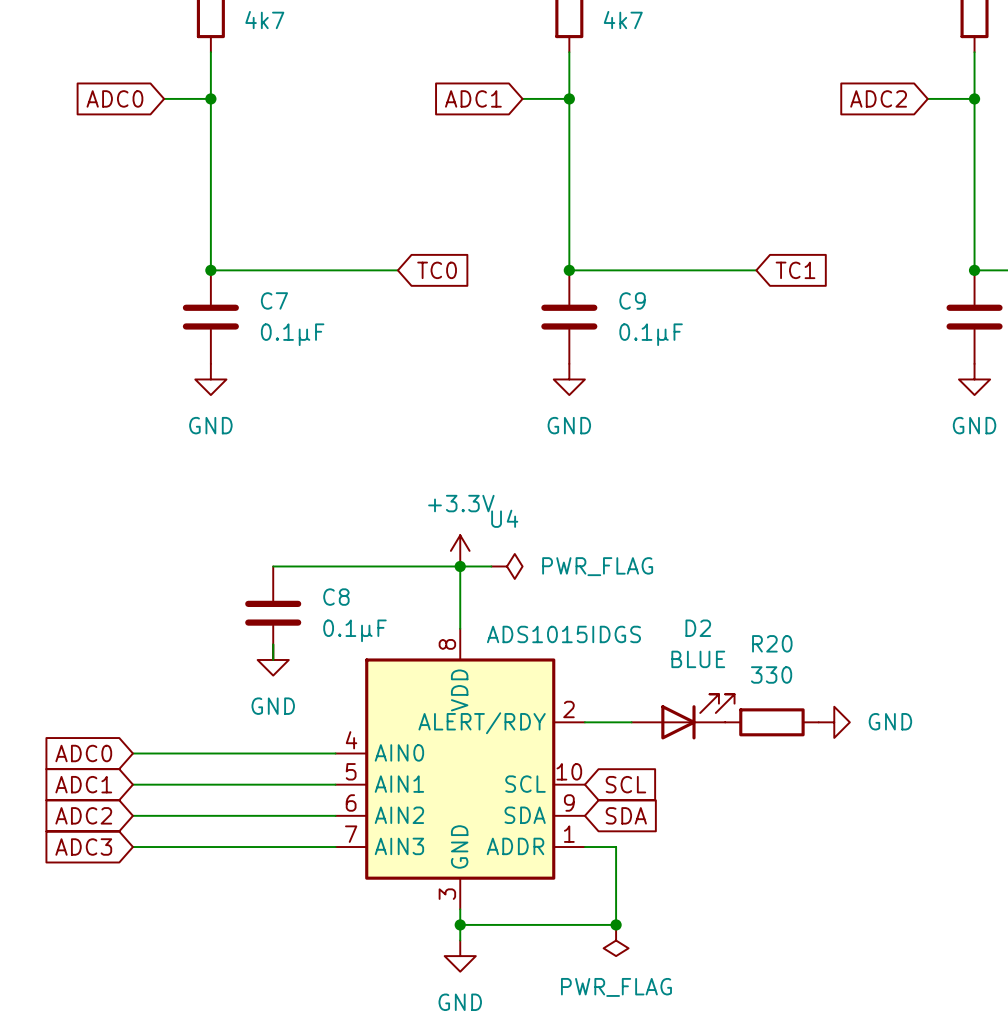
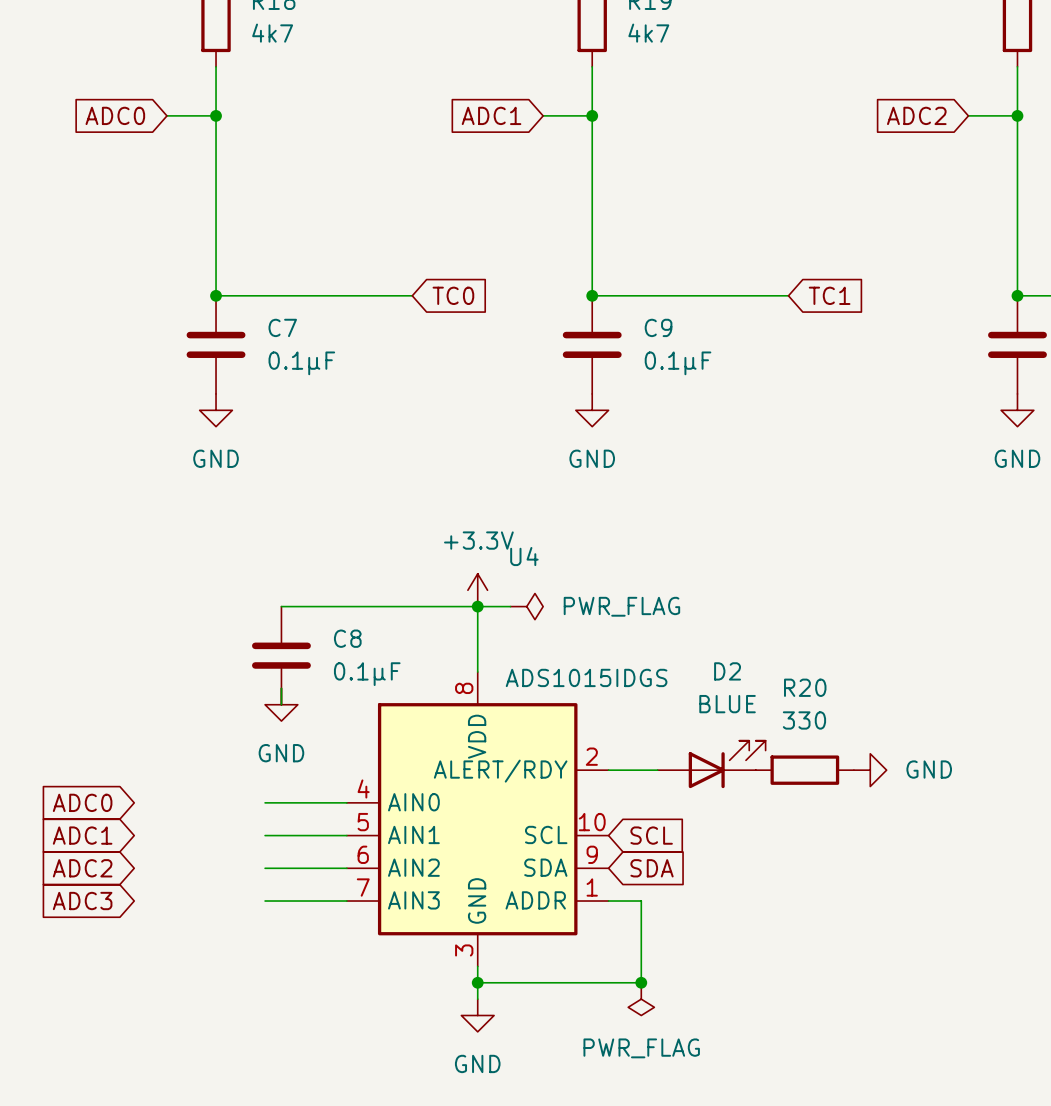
wire: (132, 753) (257, 753) -> none
wire: (132, 784) (257, 784) -> none
wire: (132, 815) (257, 815) -> none
wire: (132, 847) (257, 847) -> none

